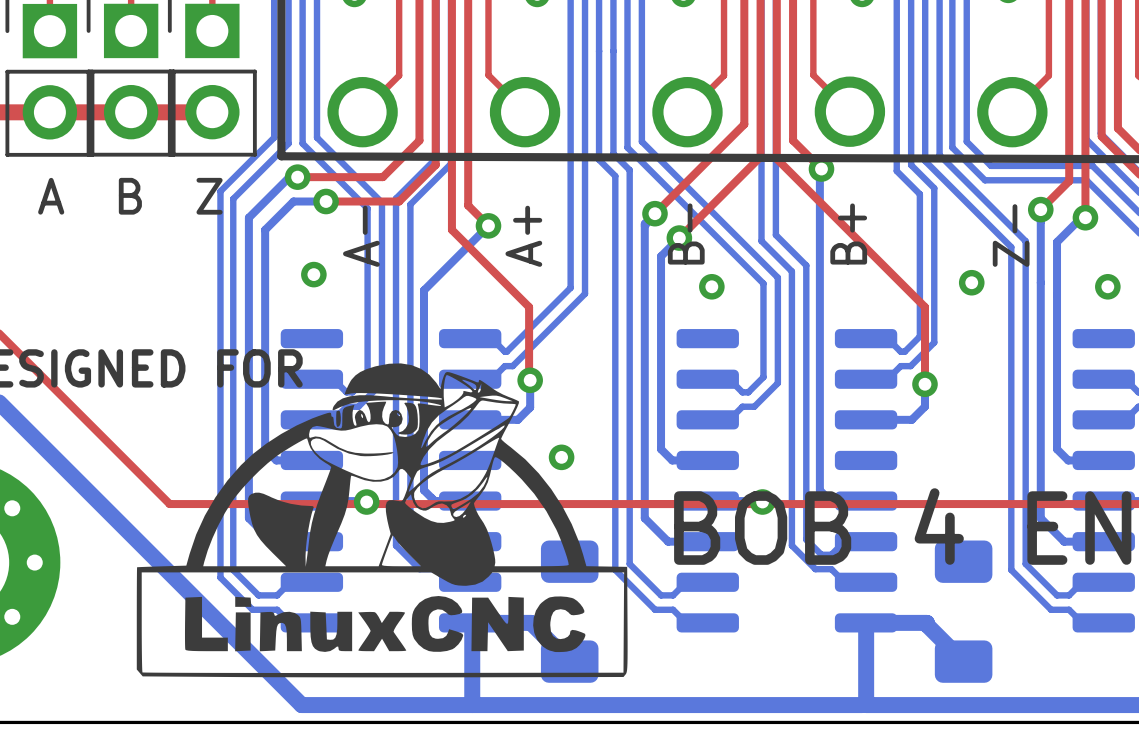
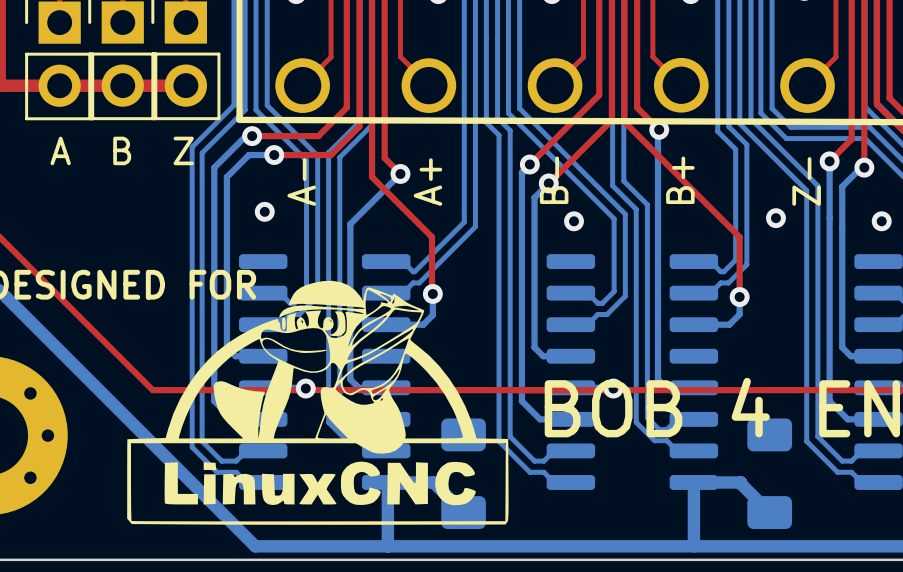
via: (561, 457) -> none

